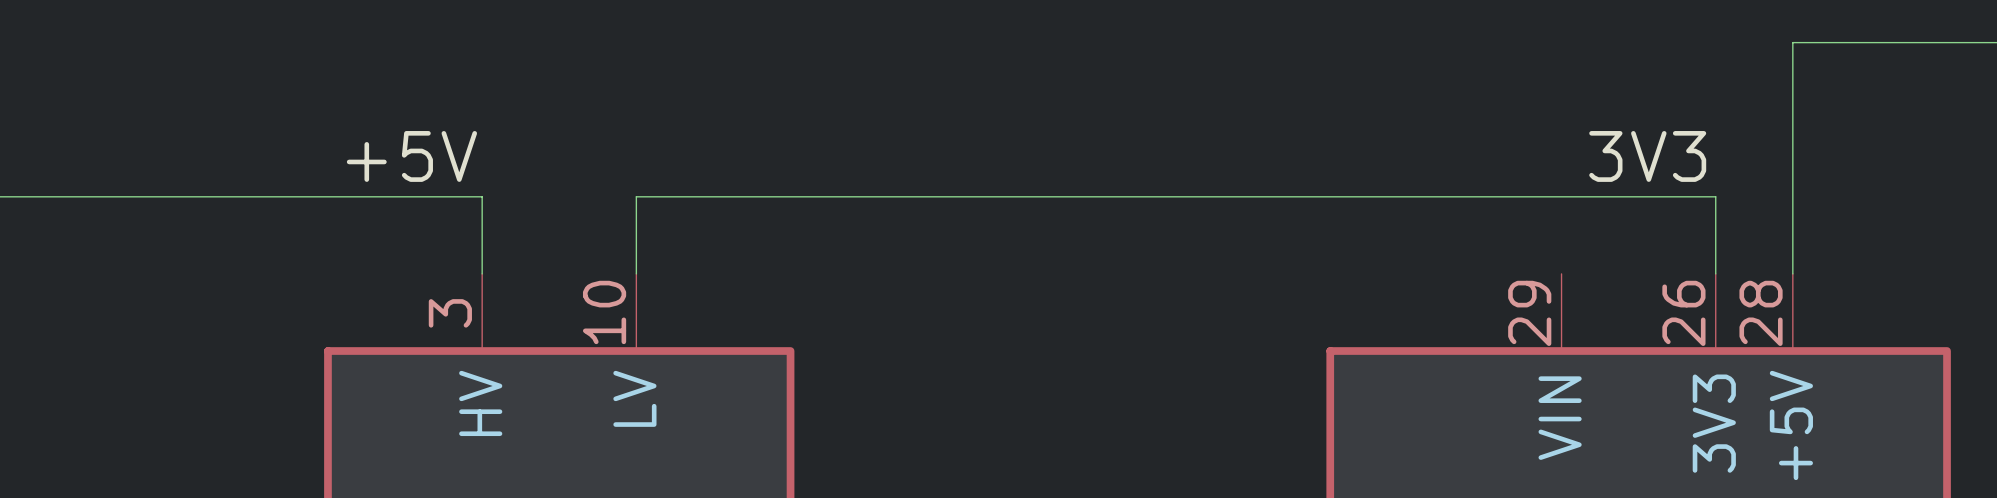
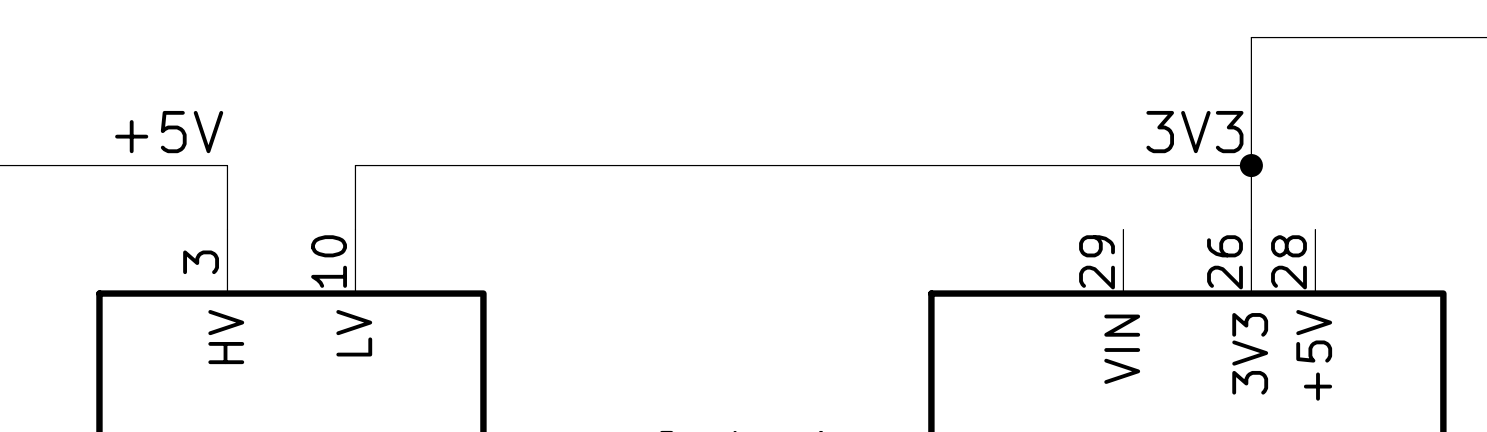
wire: (1792, 42) (1792, 273) -> (1315, 37) (1251, 37) (1251, 165)
junction: none -> (1251, 165)

